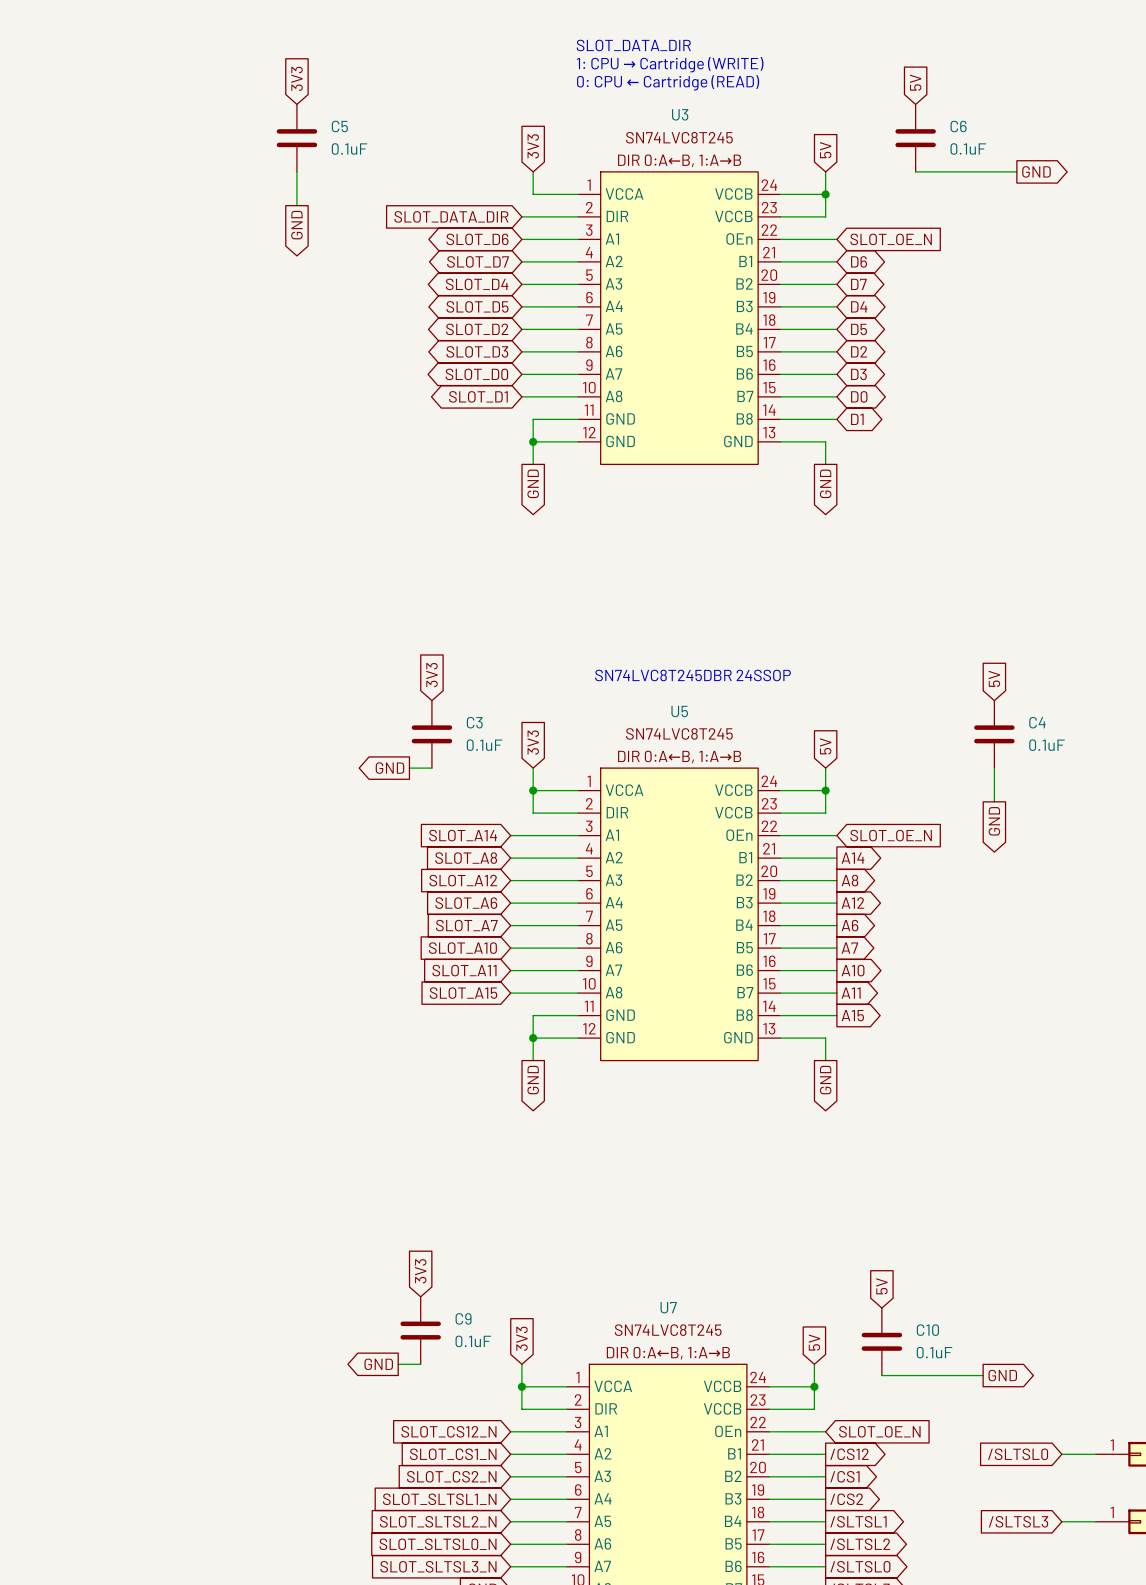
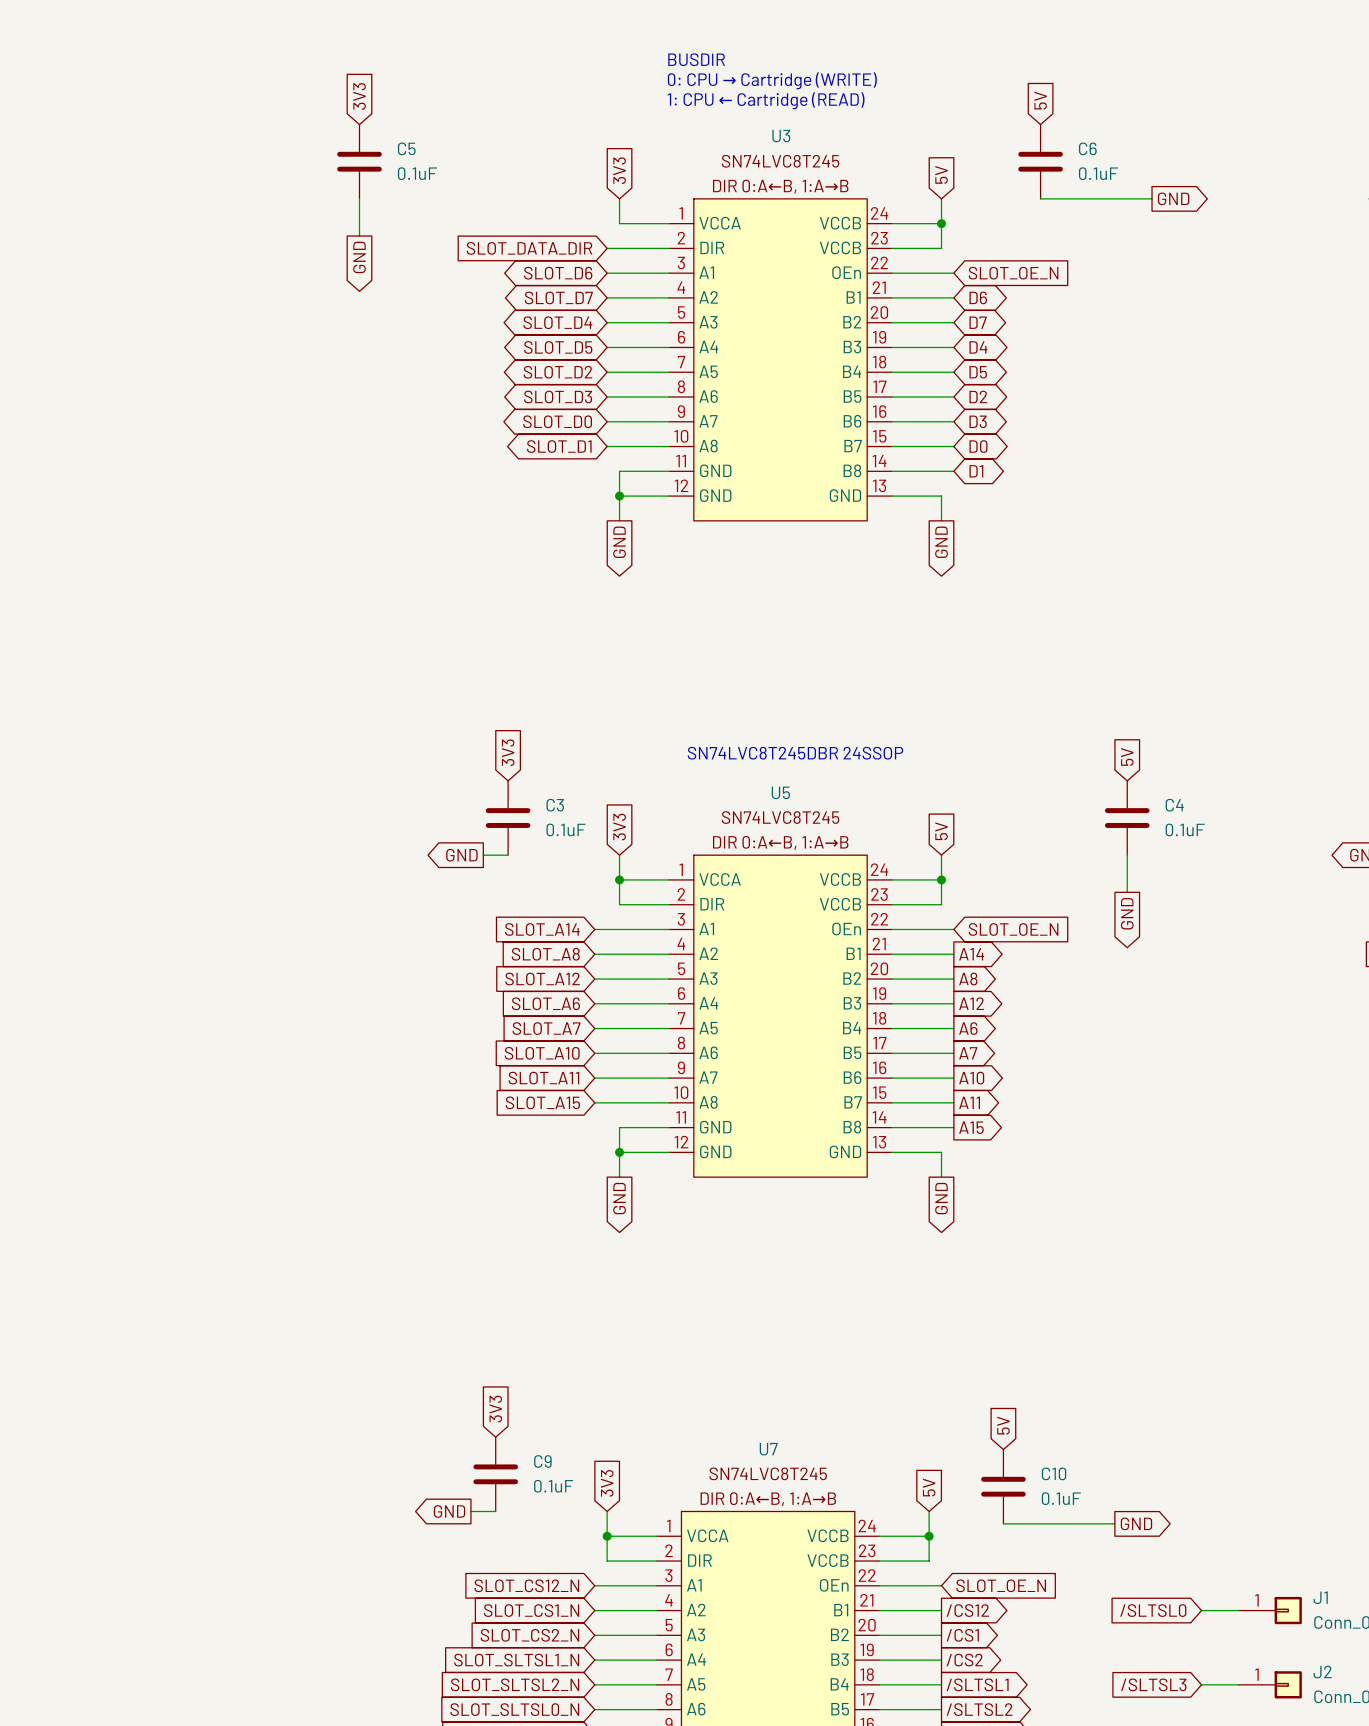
text: SLOT_DATA_DIR (633, 45) -> BUSDIR (696, 59)
text: 1: CPU → Cartridge (WRITE) (670, 64) -> 0: CPU → Cartridge (WRITE) (772, 80)
text: 0: CPU ← Cartridge (READ) (668, 82) -> 1: CPU ← Cartridge (READ) (766, 100)

